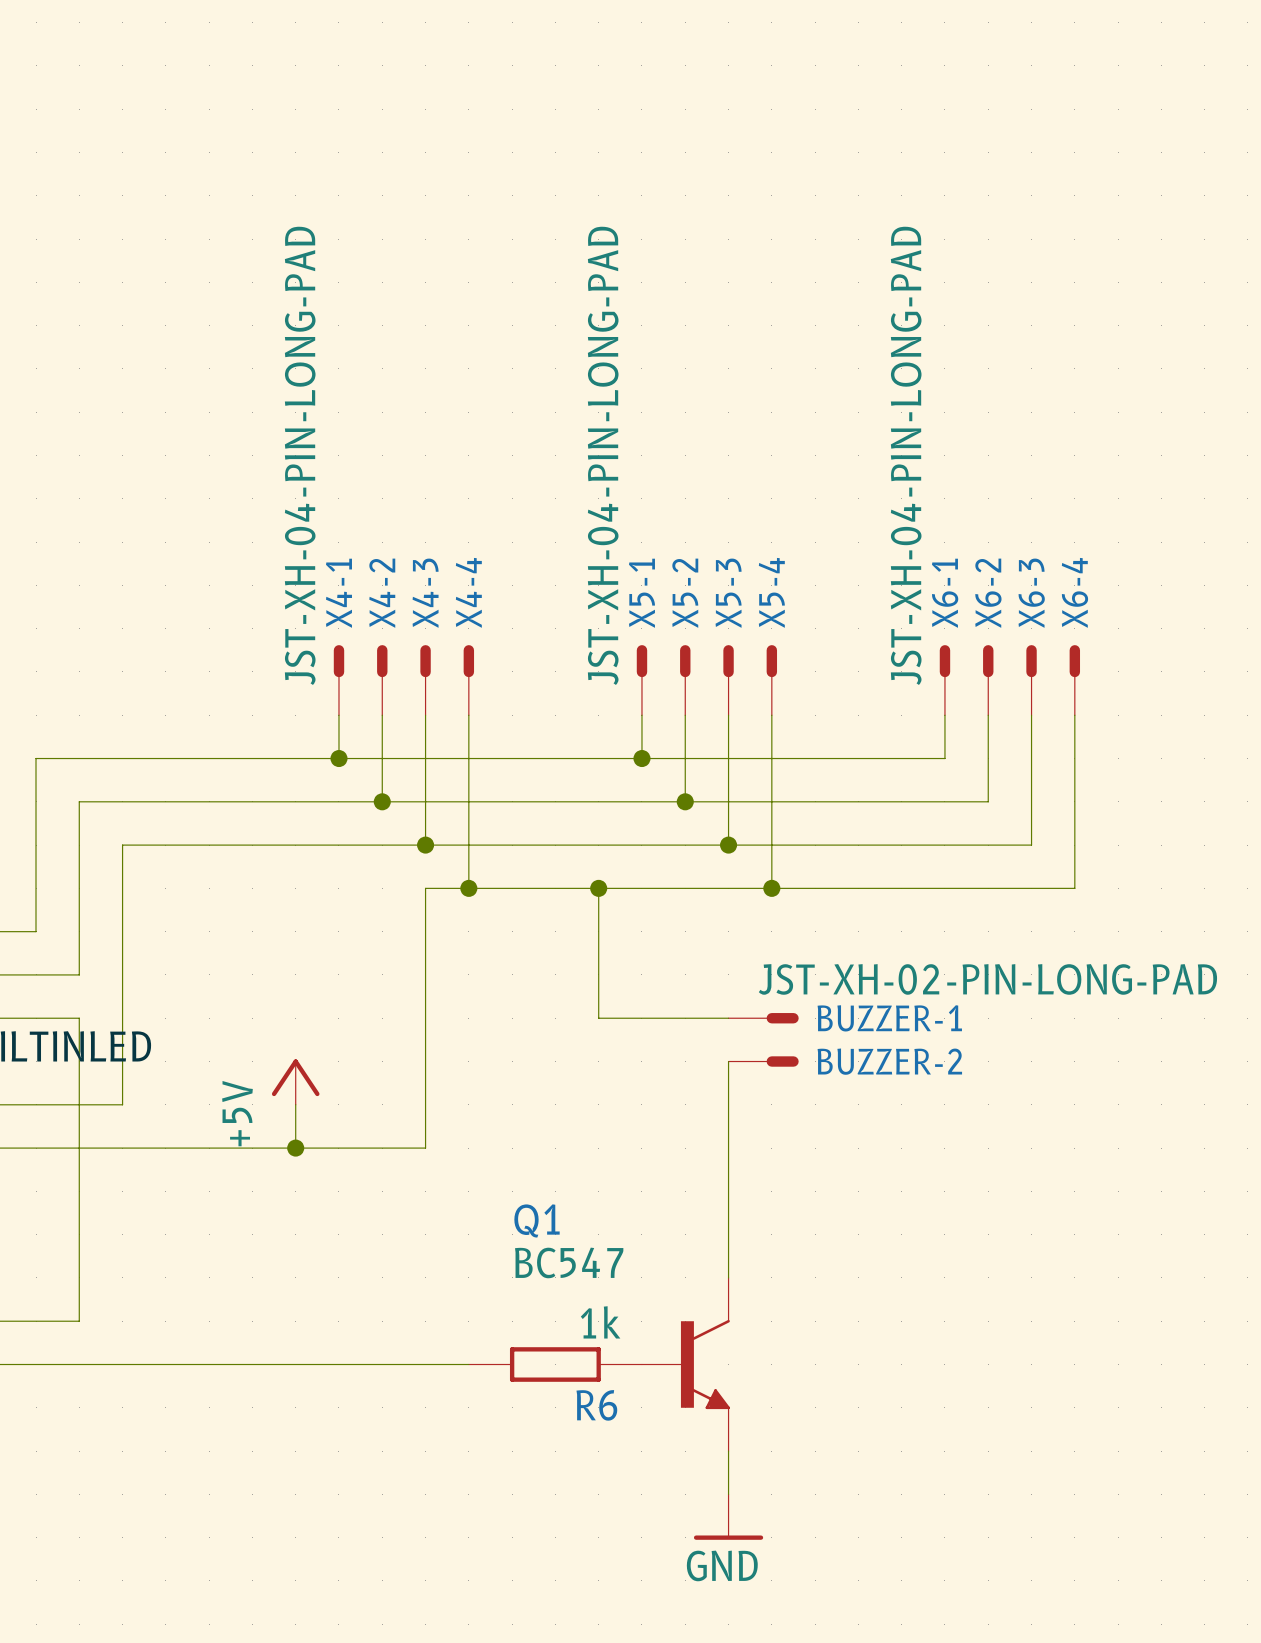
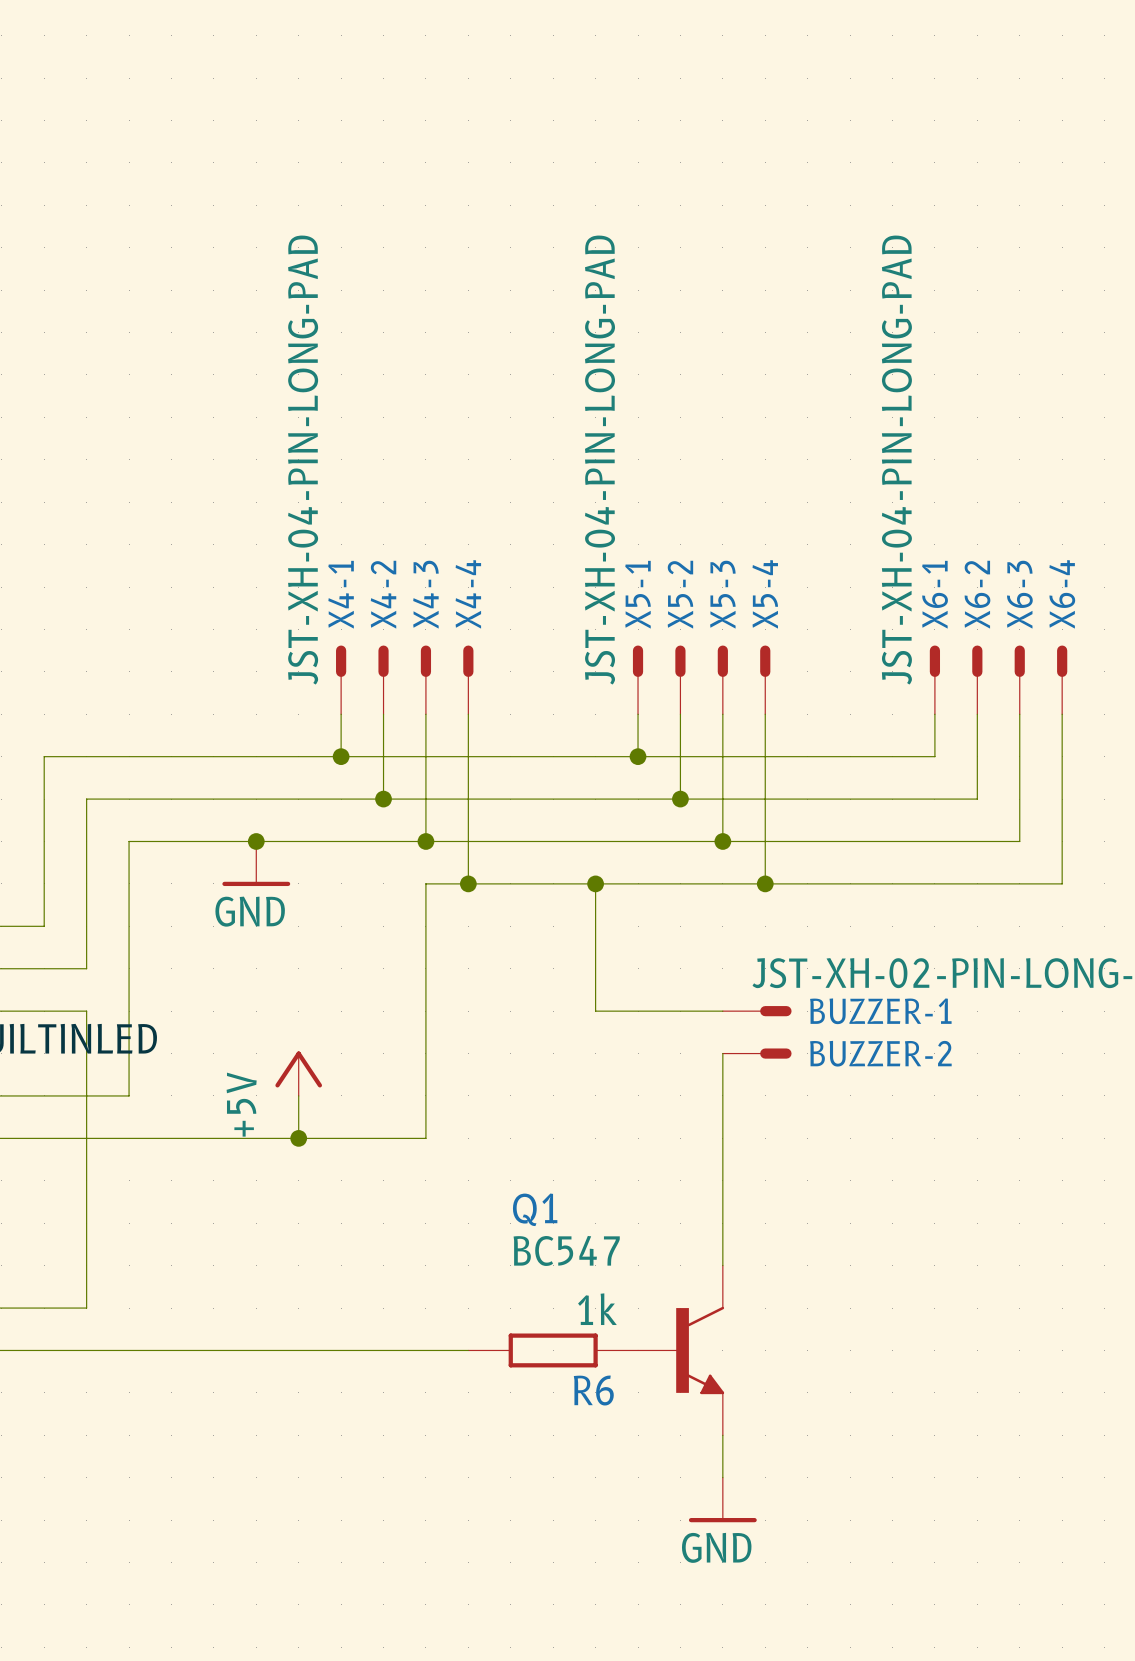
junction: none -> (256, 841)
power symbol: none -> GND (256, 863)

